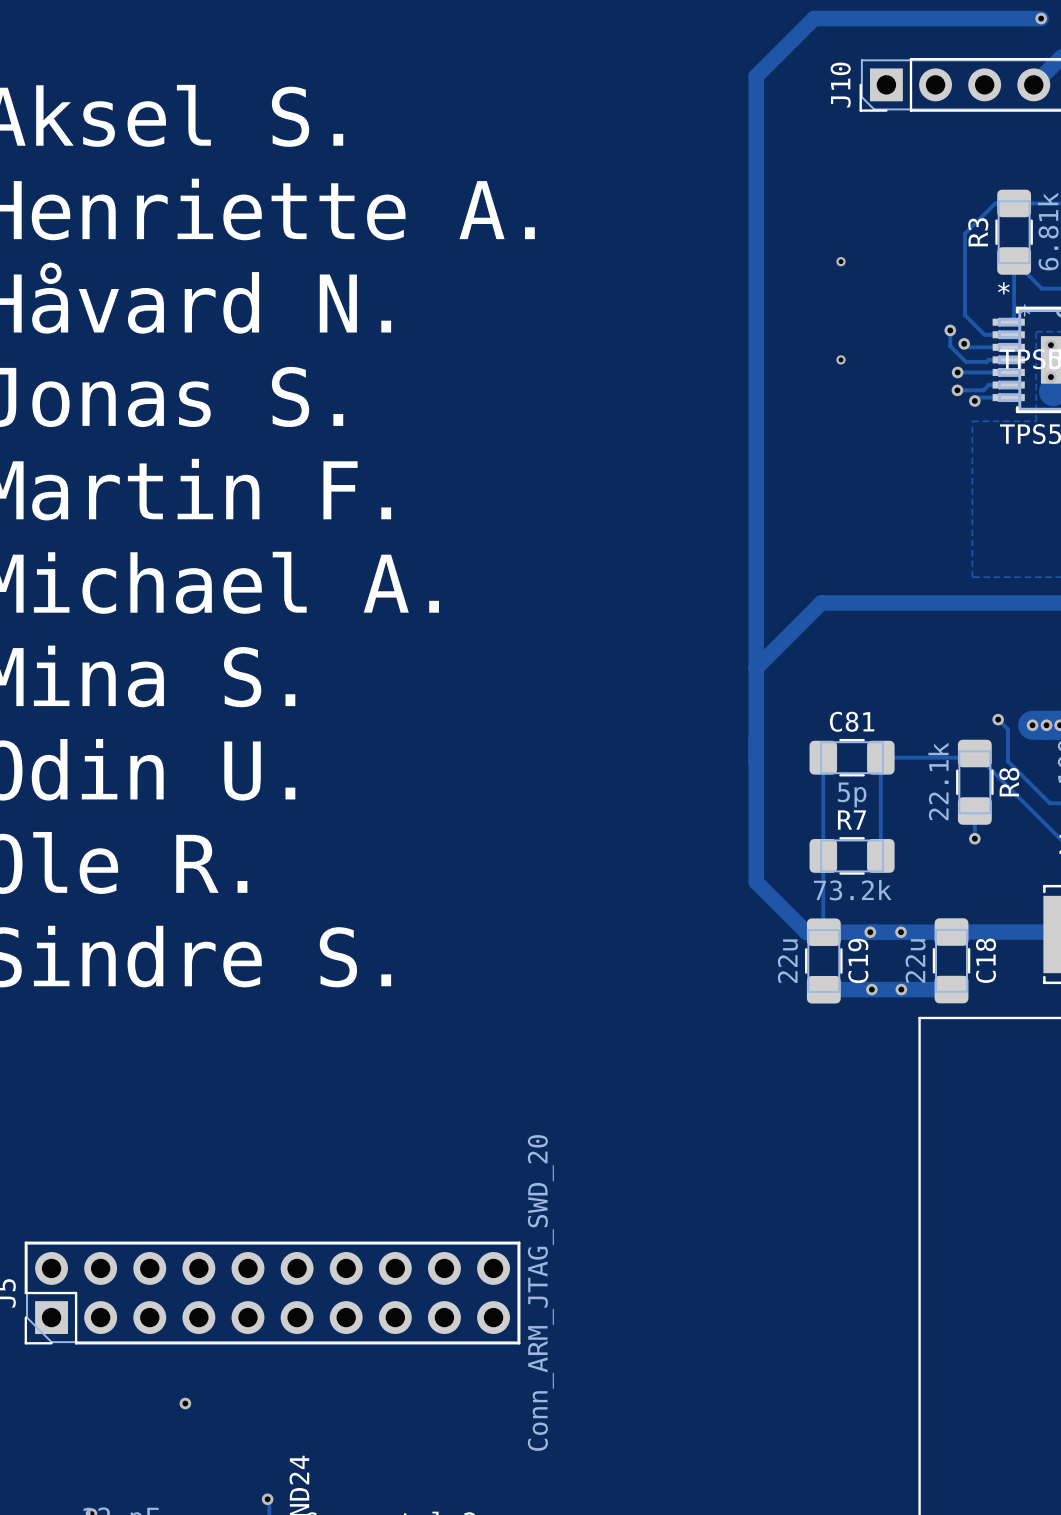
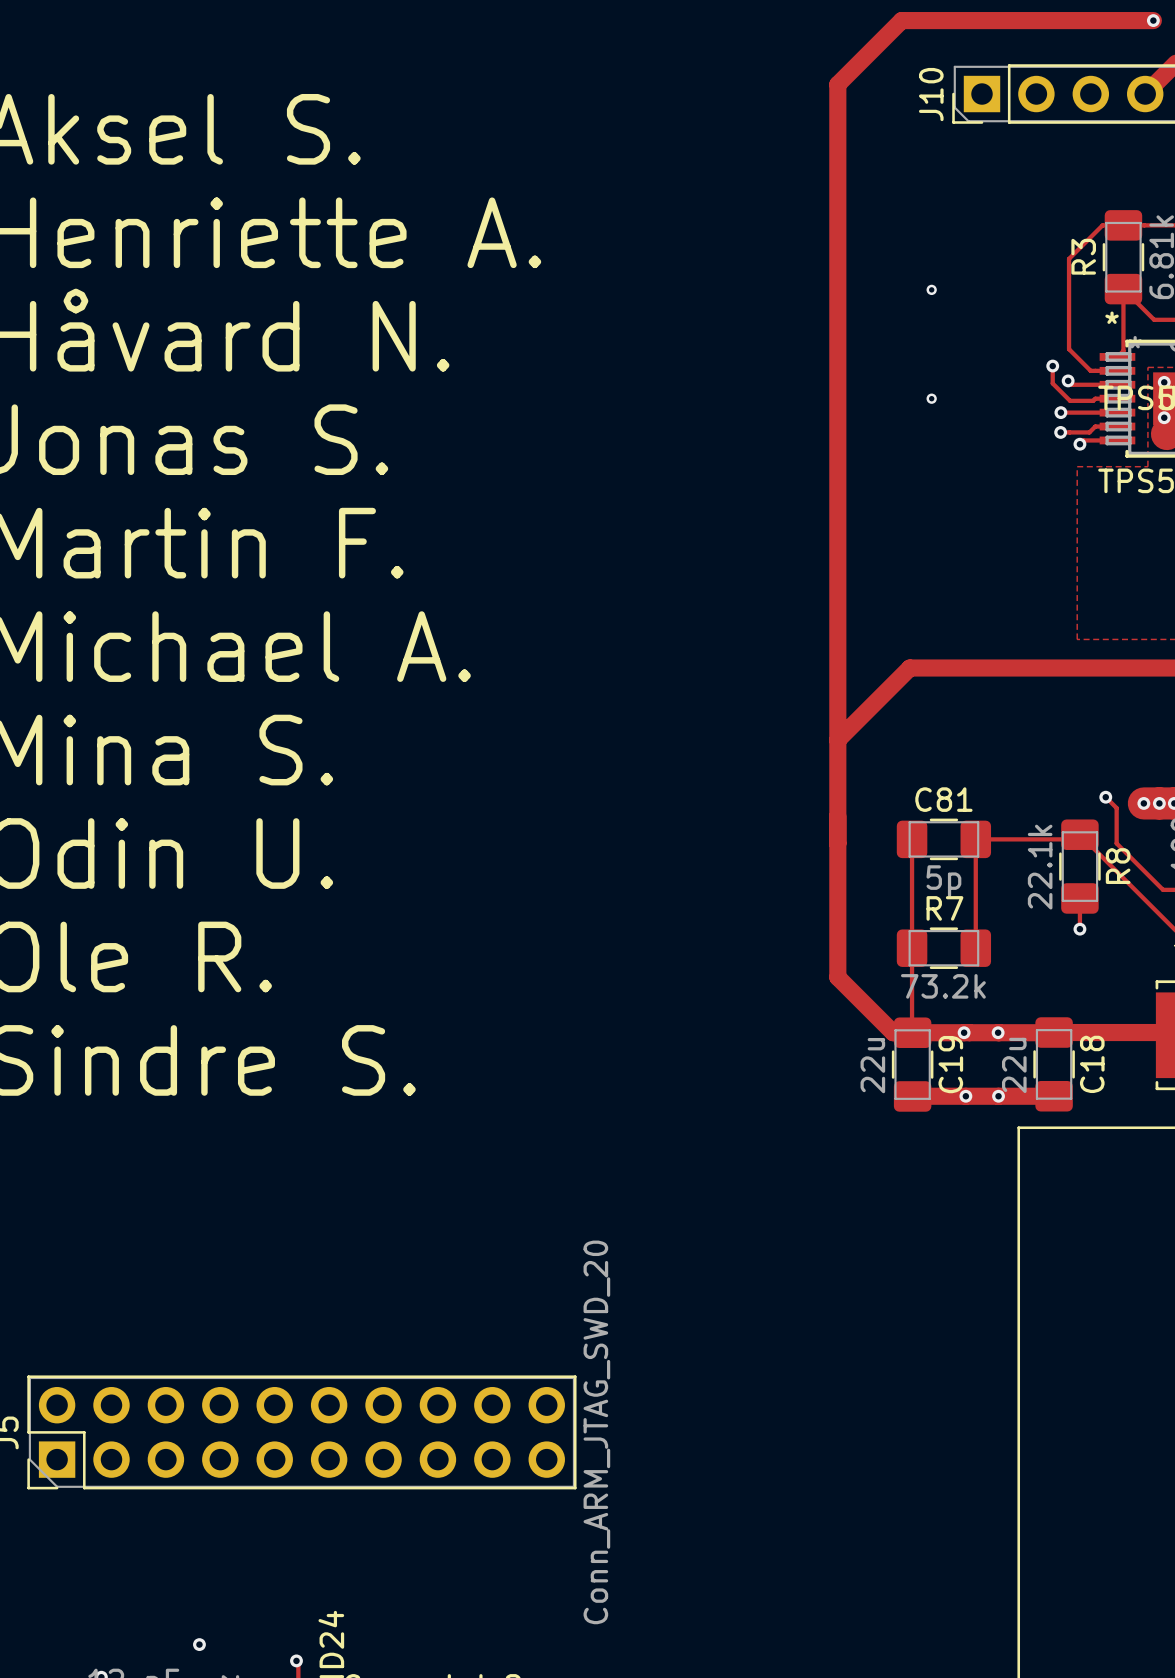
via position: (185, 1403) -> (199, 1644)

